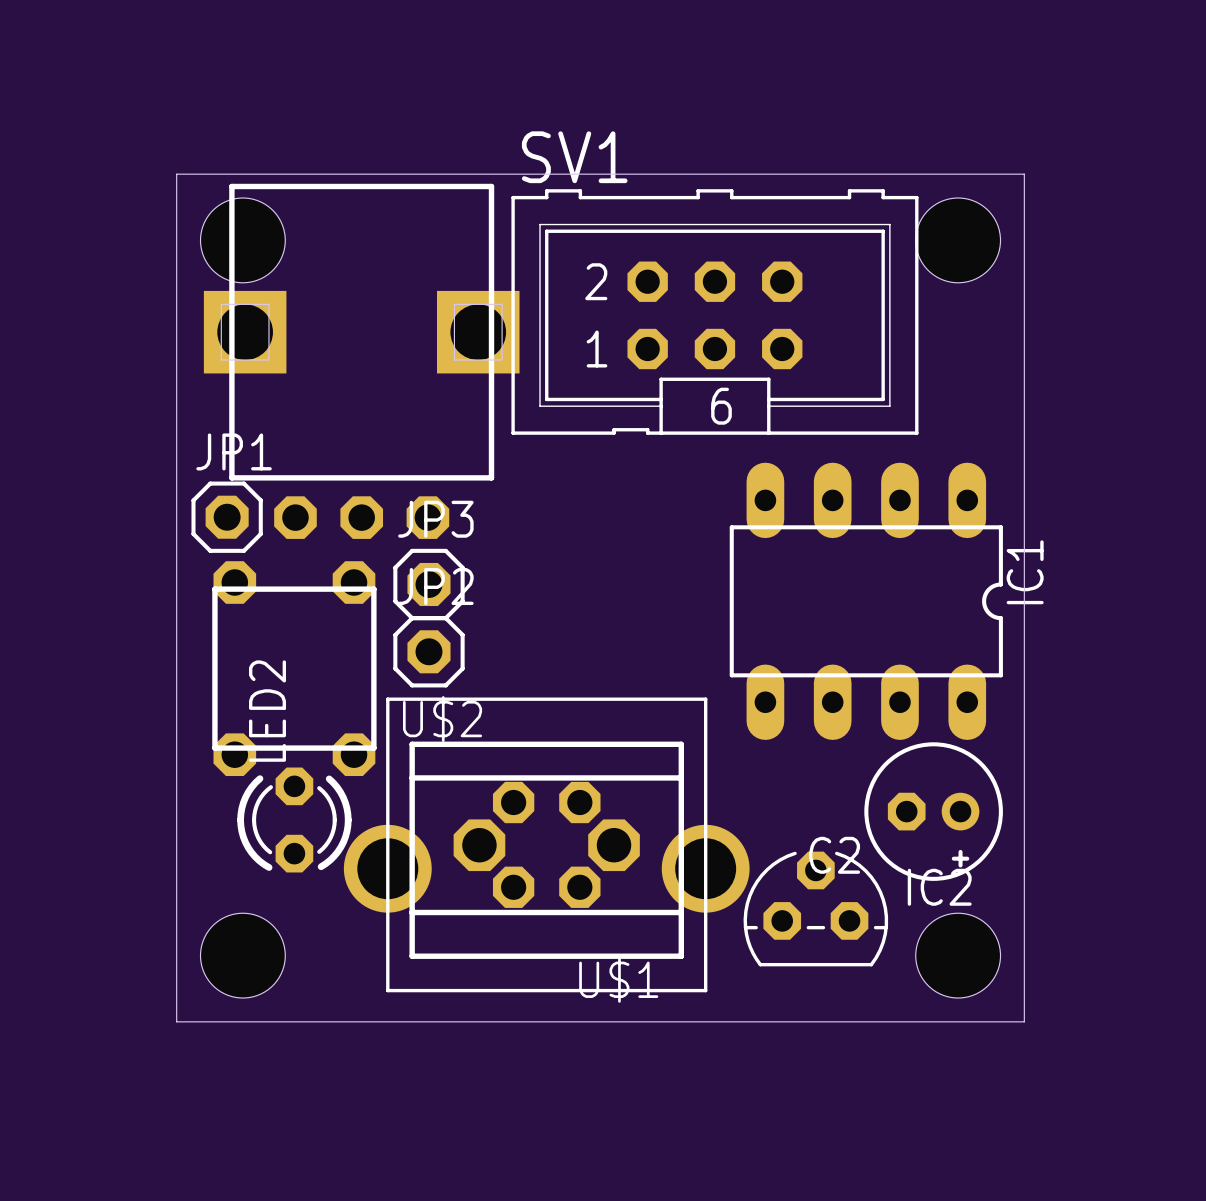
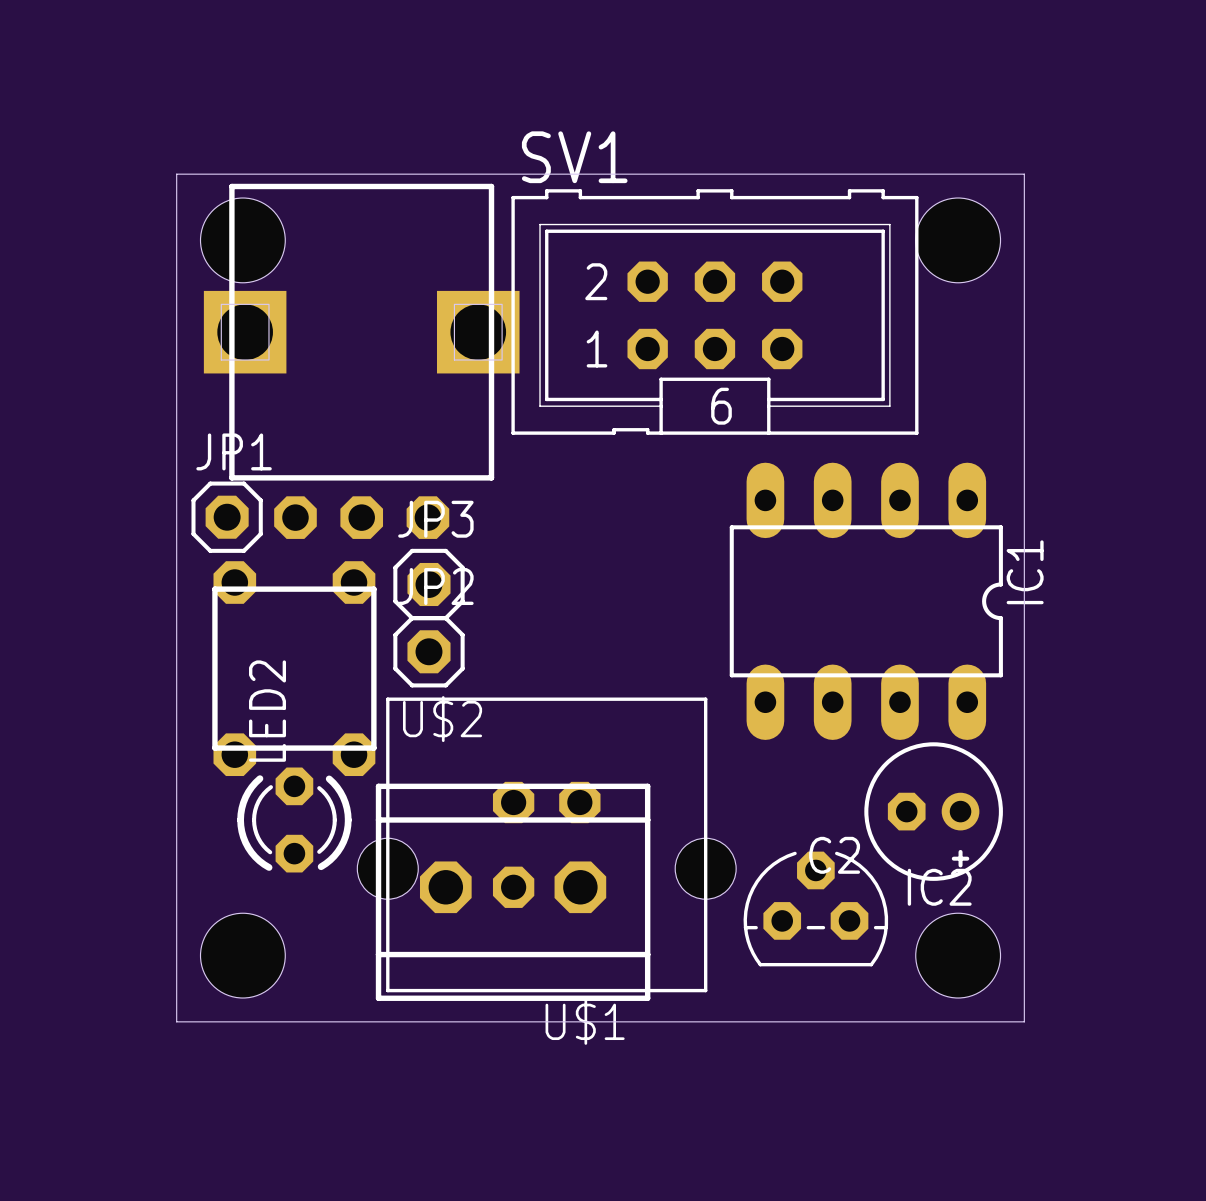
U$2 footprint: [343, 697, 750, 993] -> [357, 697, 737, 993]
U$1 position: (546, 850) -> (513, 892)

